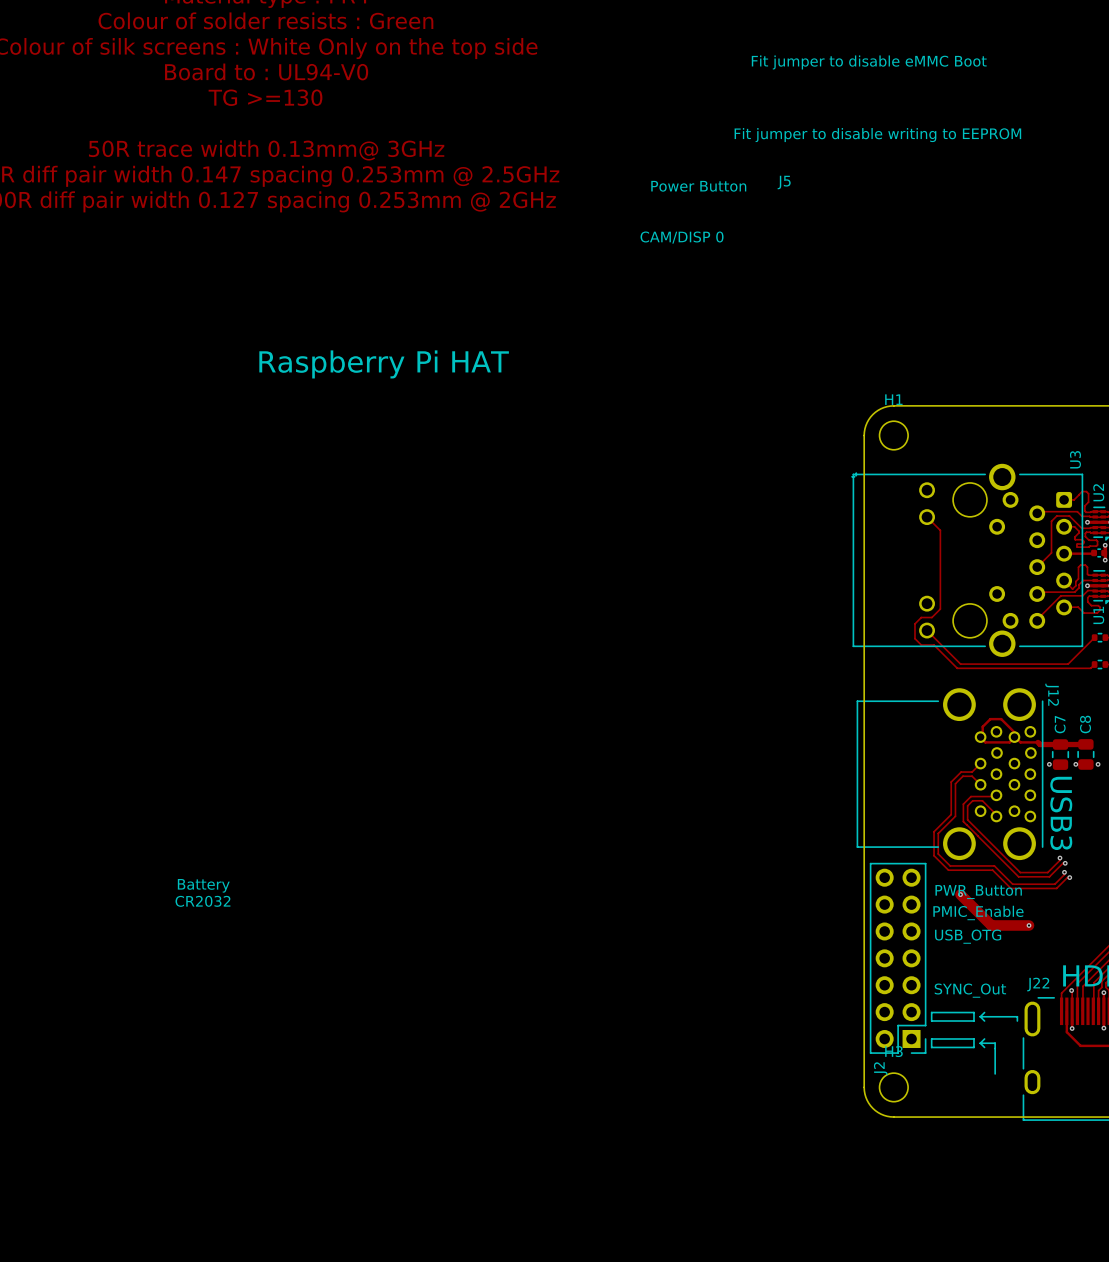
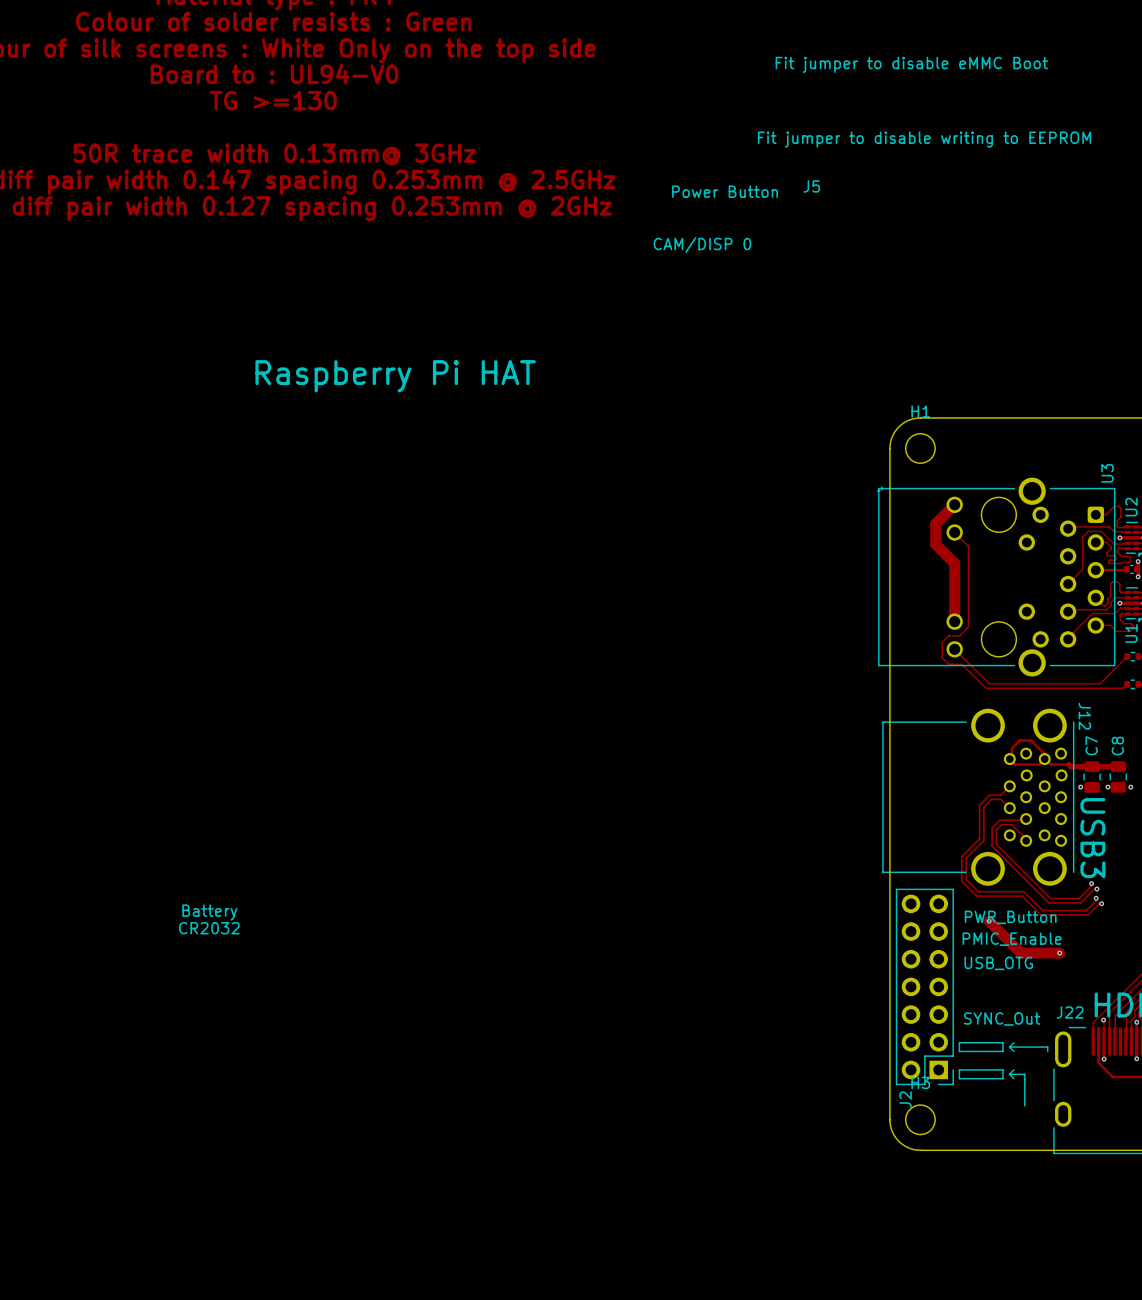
track: none -> (954, 504) (935, 523) (935, 544) (954, 563) (954, 621)

